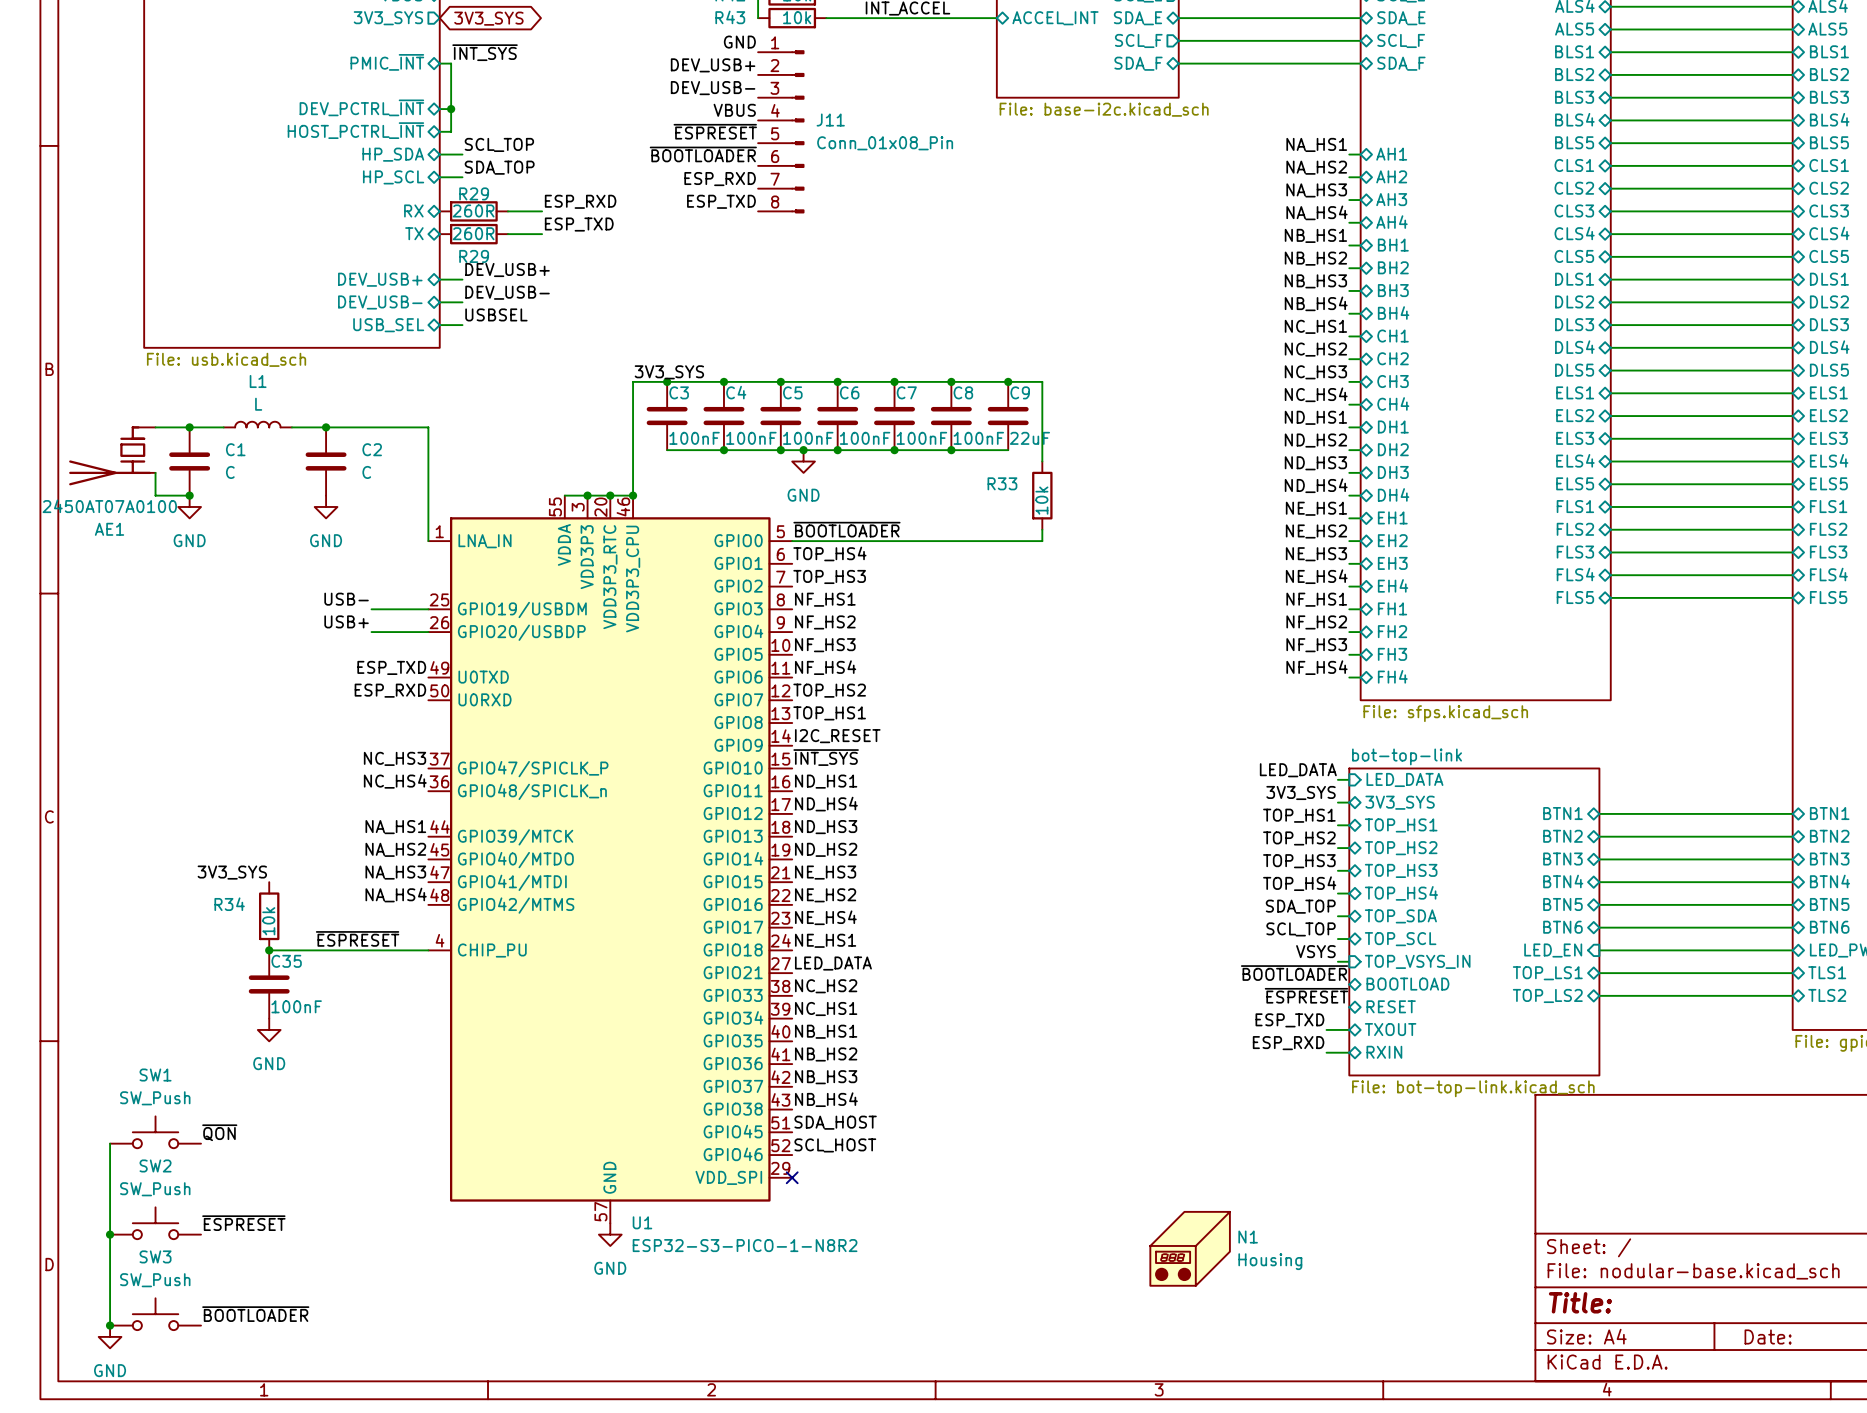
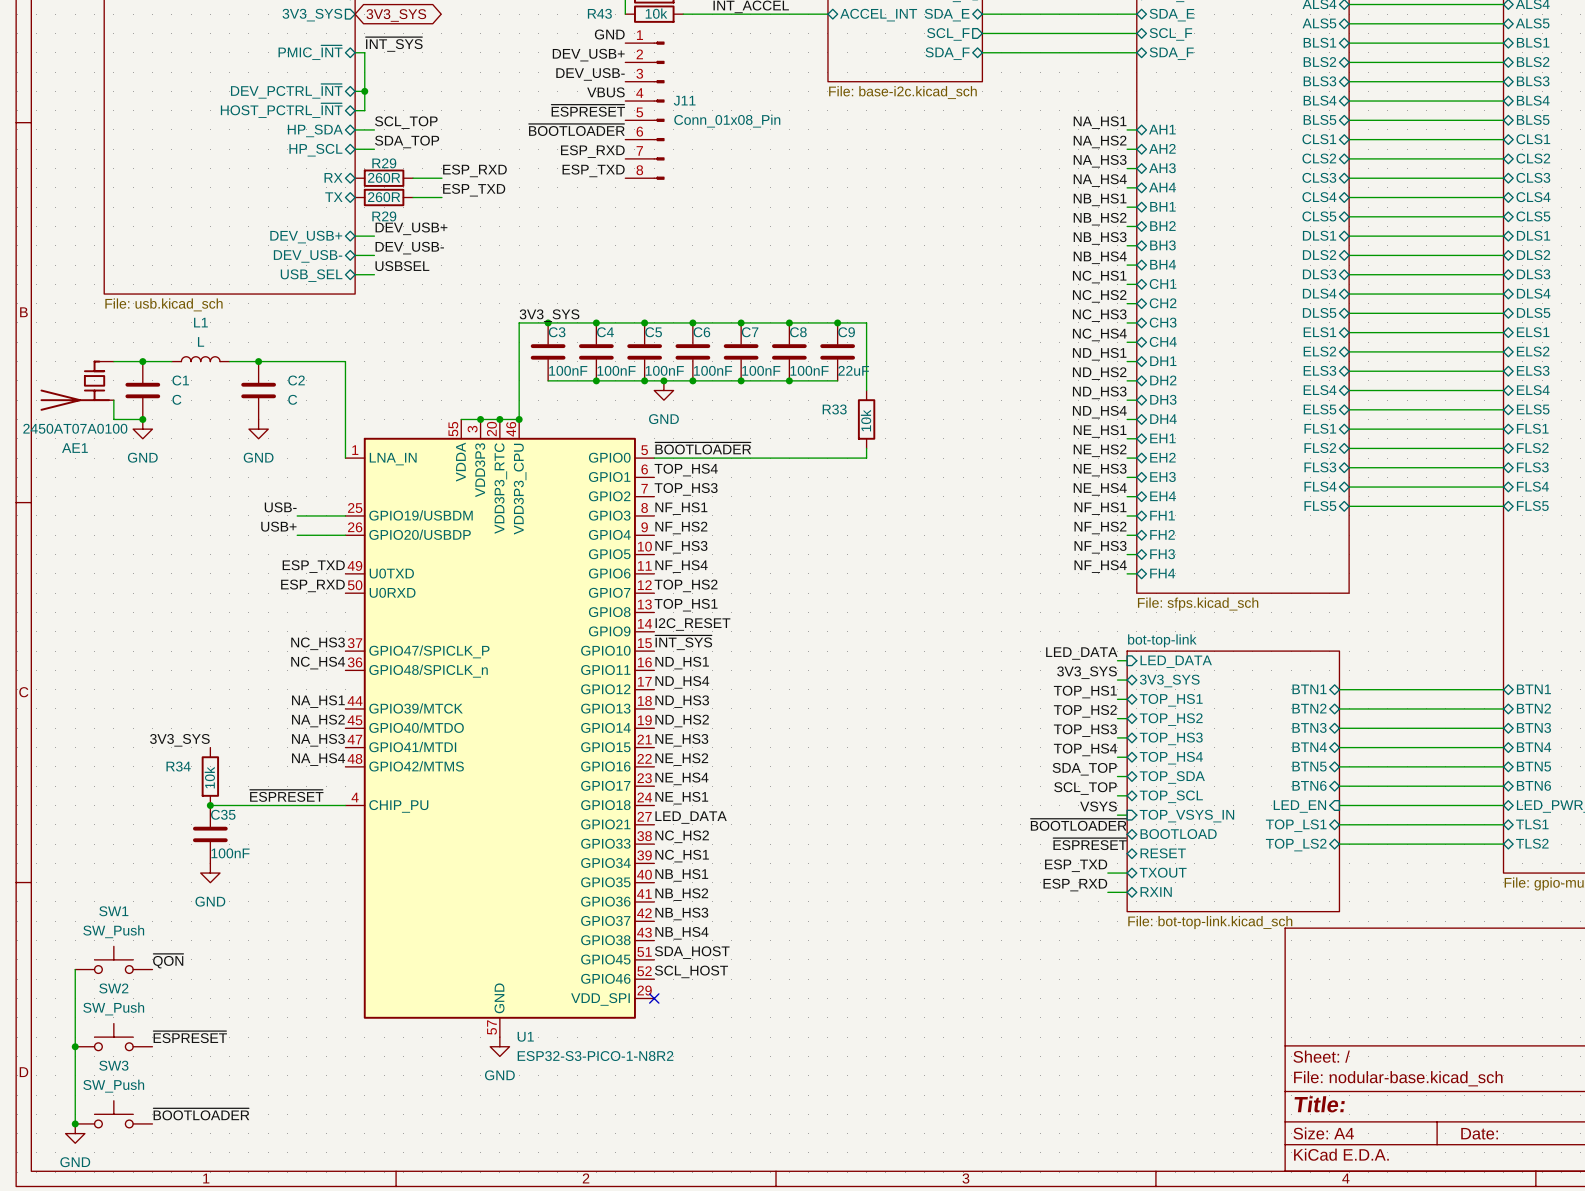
N1: Housing (1190, 1248) -> none

